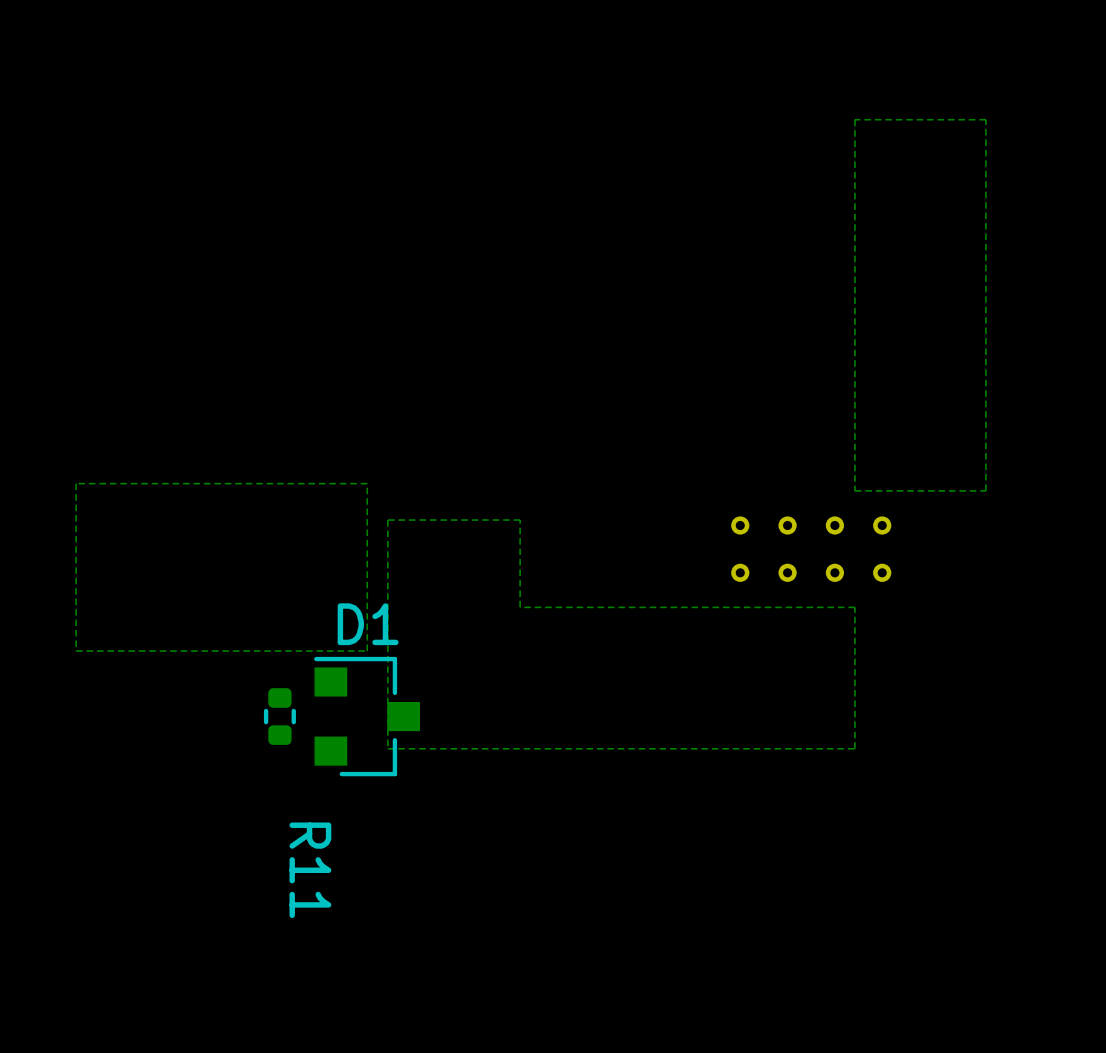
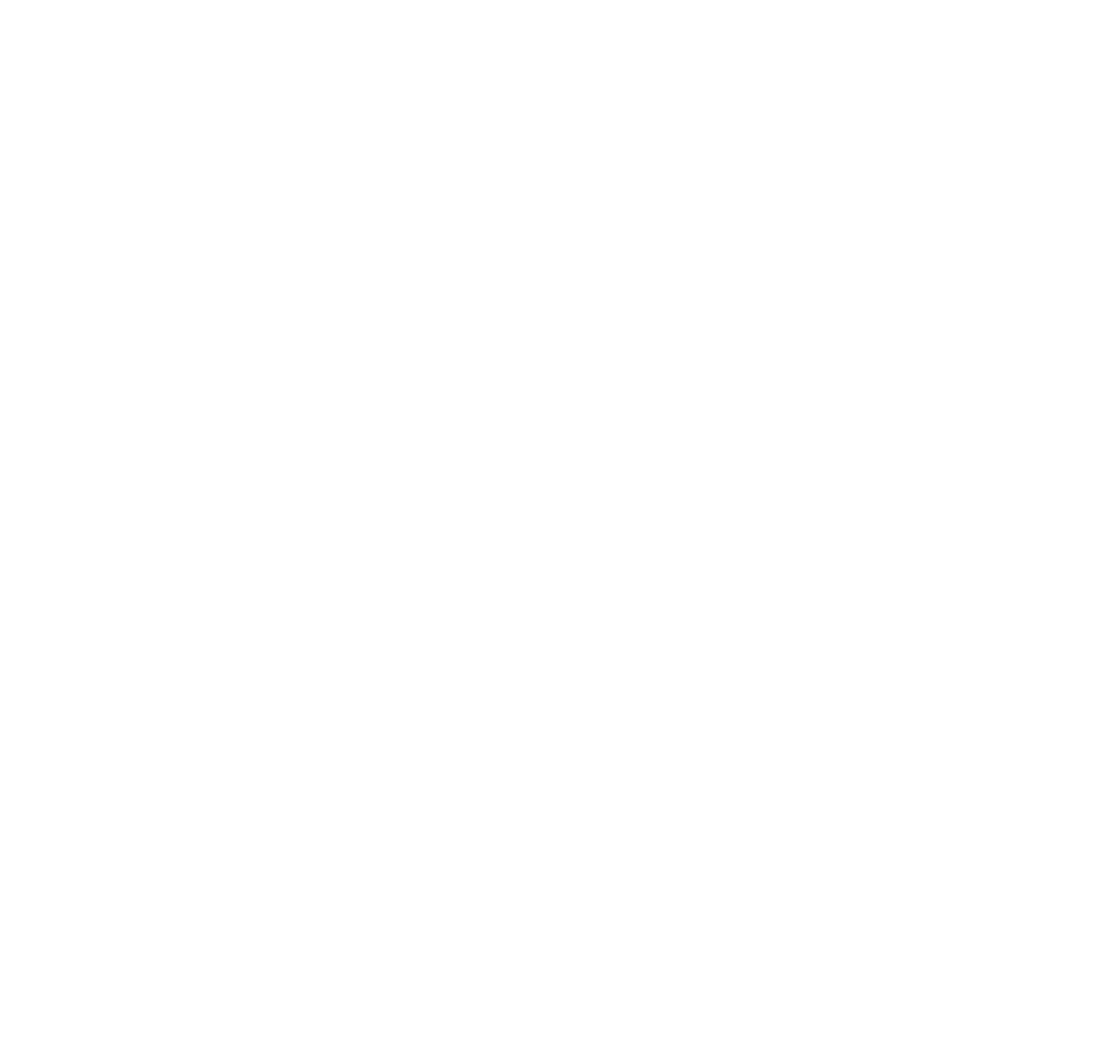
zone outline: (985, 119) (985, 490) (854, 490) (854, 119) (985, 119) -> none
zone outline: (367, 483) (367, 651) (76, 651) (76, 483) (367, 483) -> none
zone outline: (520, 520) (520, 607) (854, 607) (854, 748) (387, 748) (387, 520) (520, 520) -> none
part: (811, 549) -> none
R11: (279, 716) -> none
D1: (367, 716) -> none

